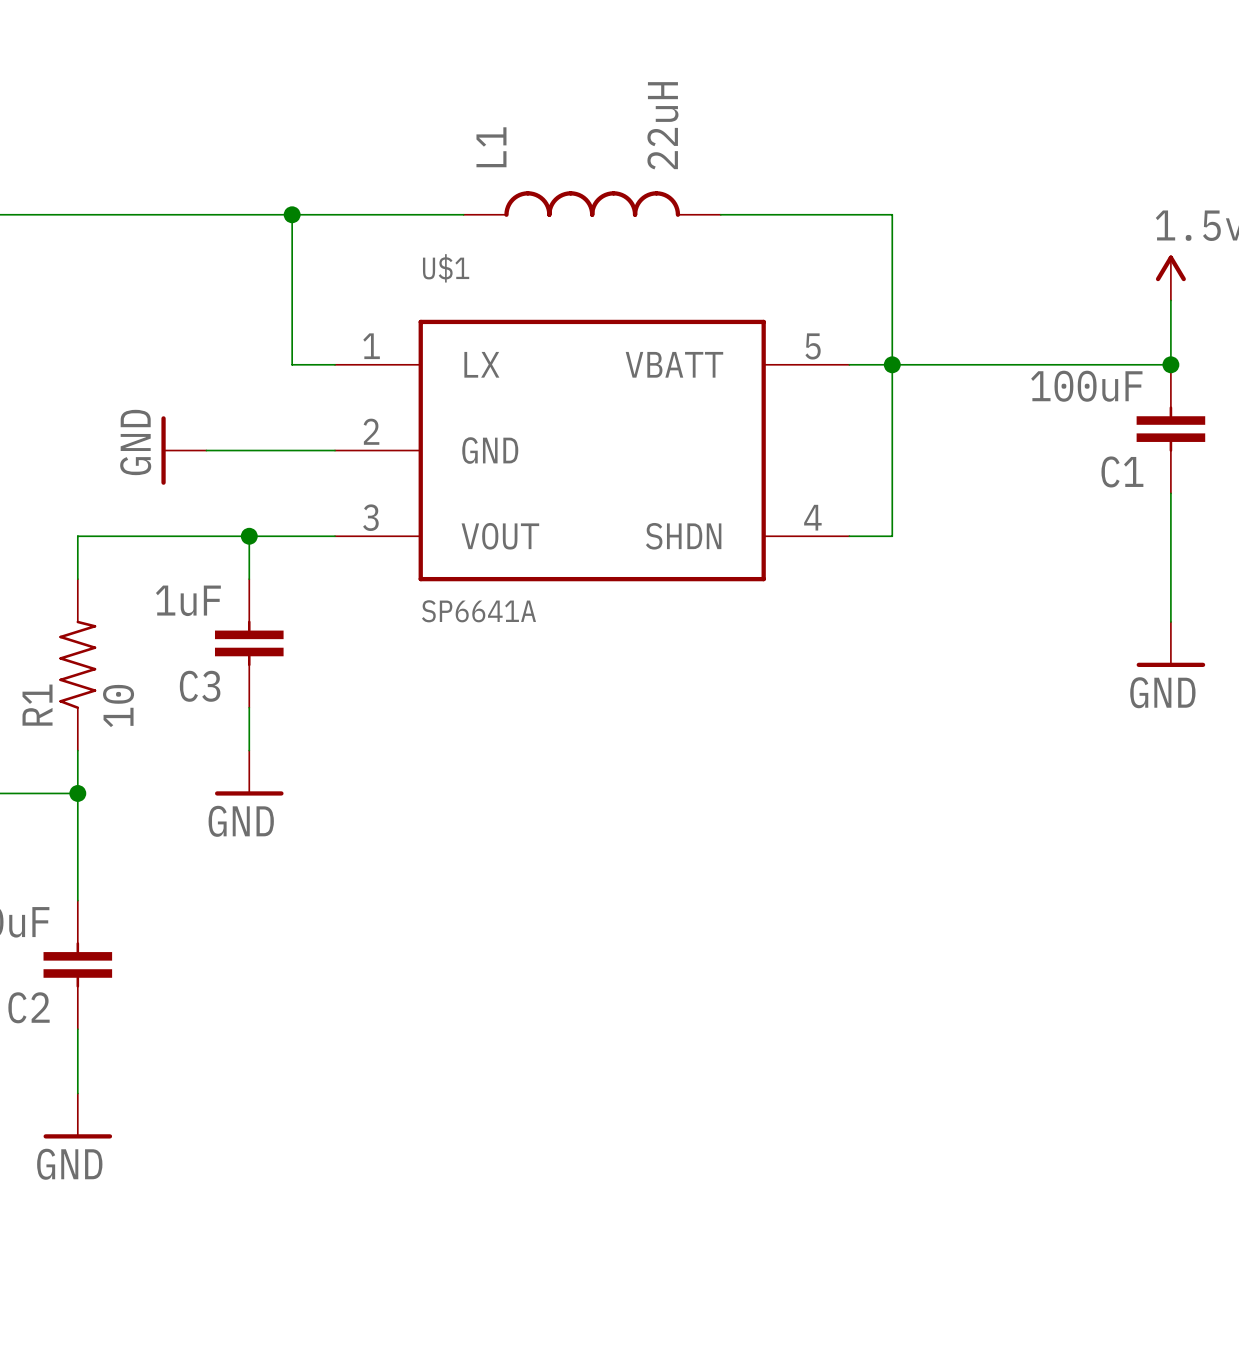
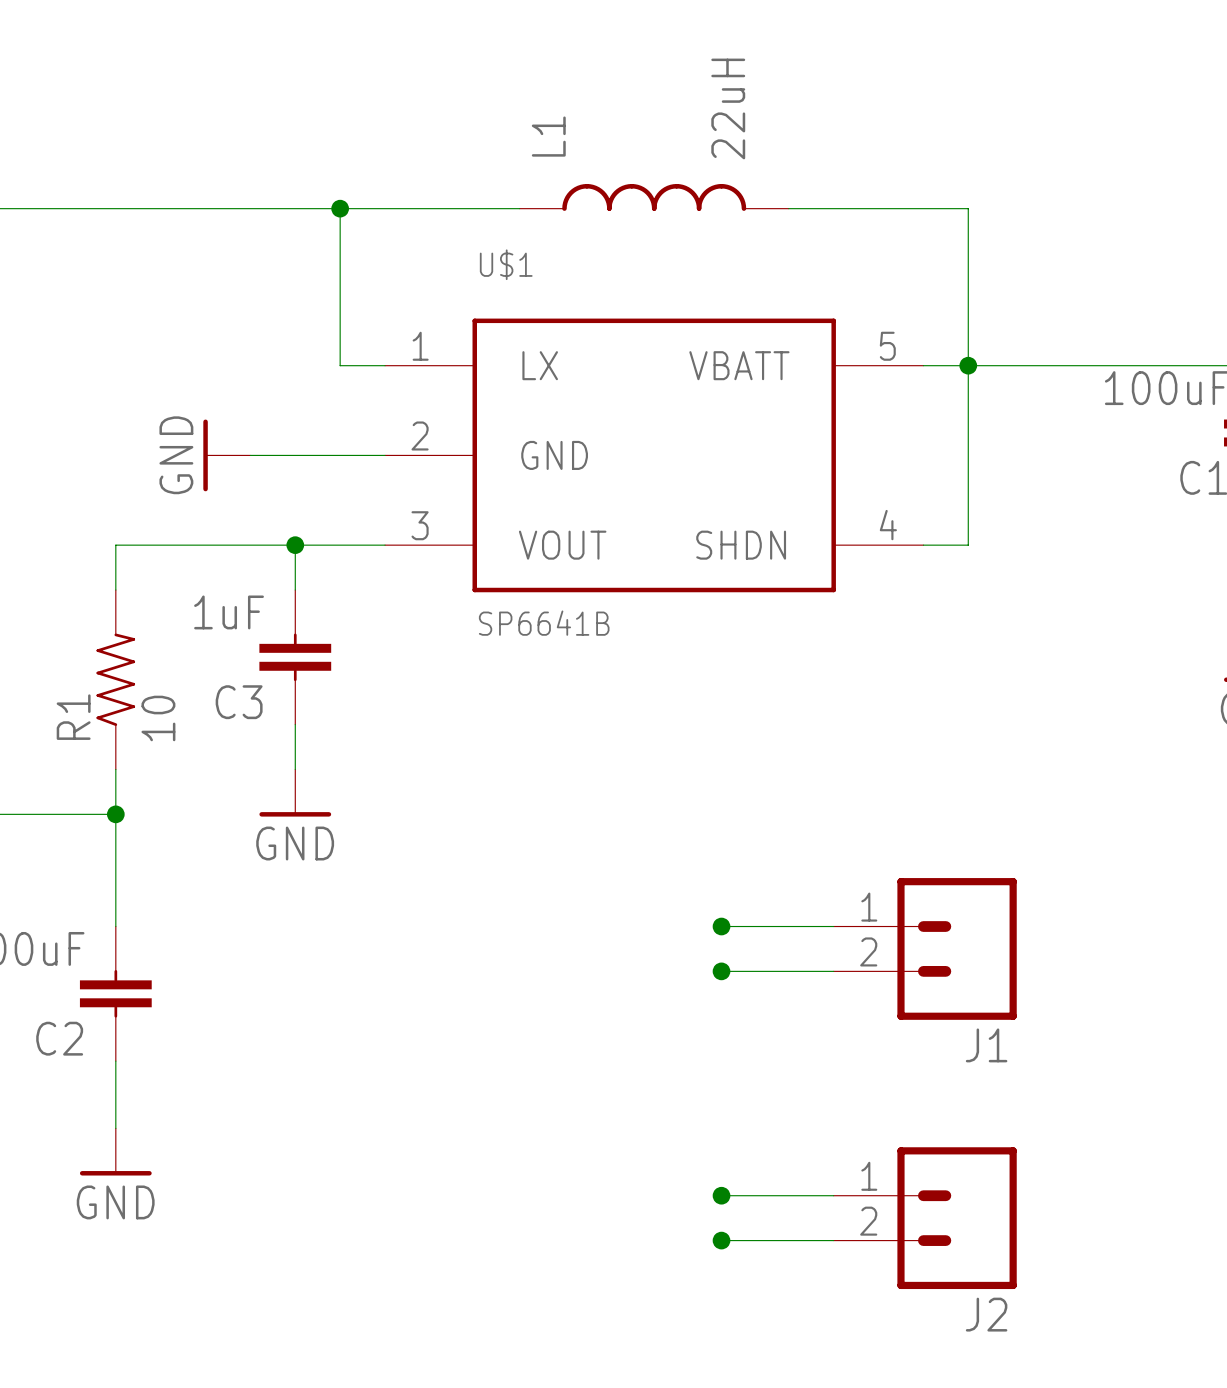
U$1 value: SP6641A (478, 611) -> SP6641B (544, 623)
wire: none -> (721, 926) (833, 926)
junction: none -> (721, 926)
J1: none -> (925, 948)
wire: none -> (721, 971) (833, 971)
junction: none -> (721, 971)
wire: none -> (721, 1195) (833, 1195)
junction: none -> (721, 1195)
J2: none -> (925, 1218)
wire: none -> (721, 1240) (833, 1240)
junction: none -> (721, 1240)

